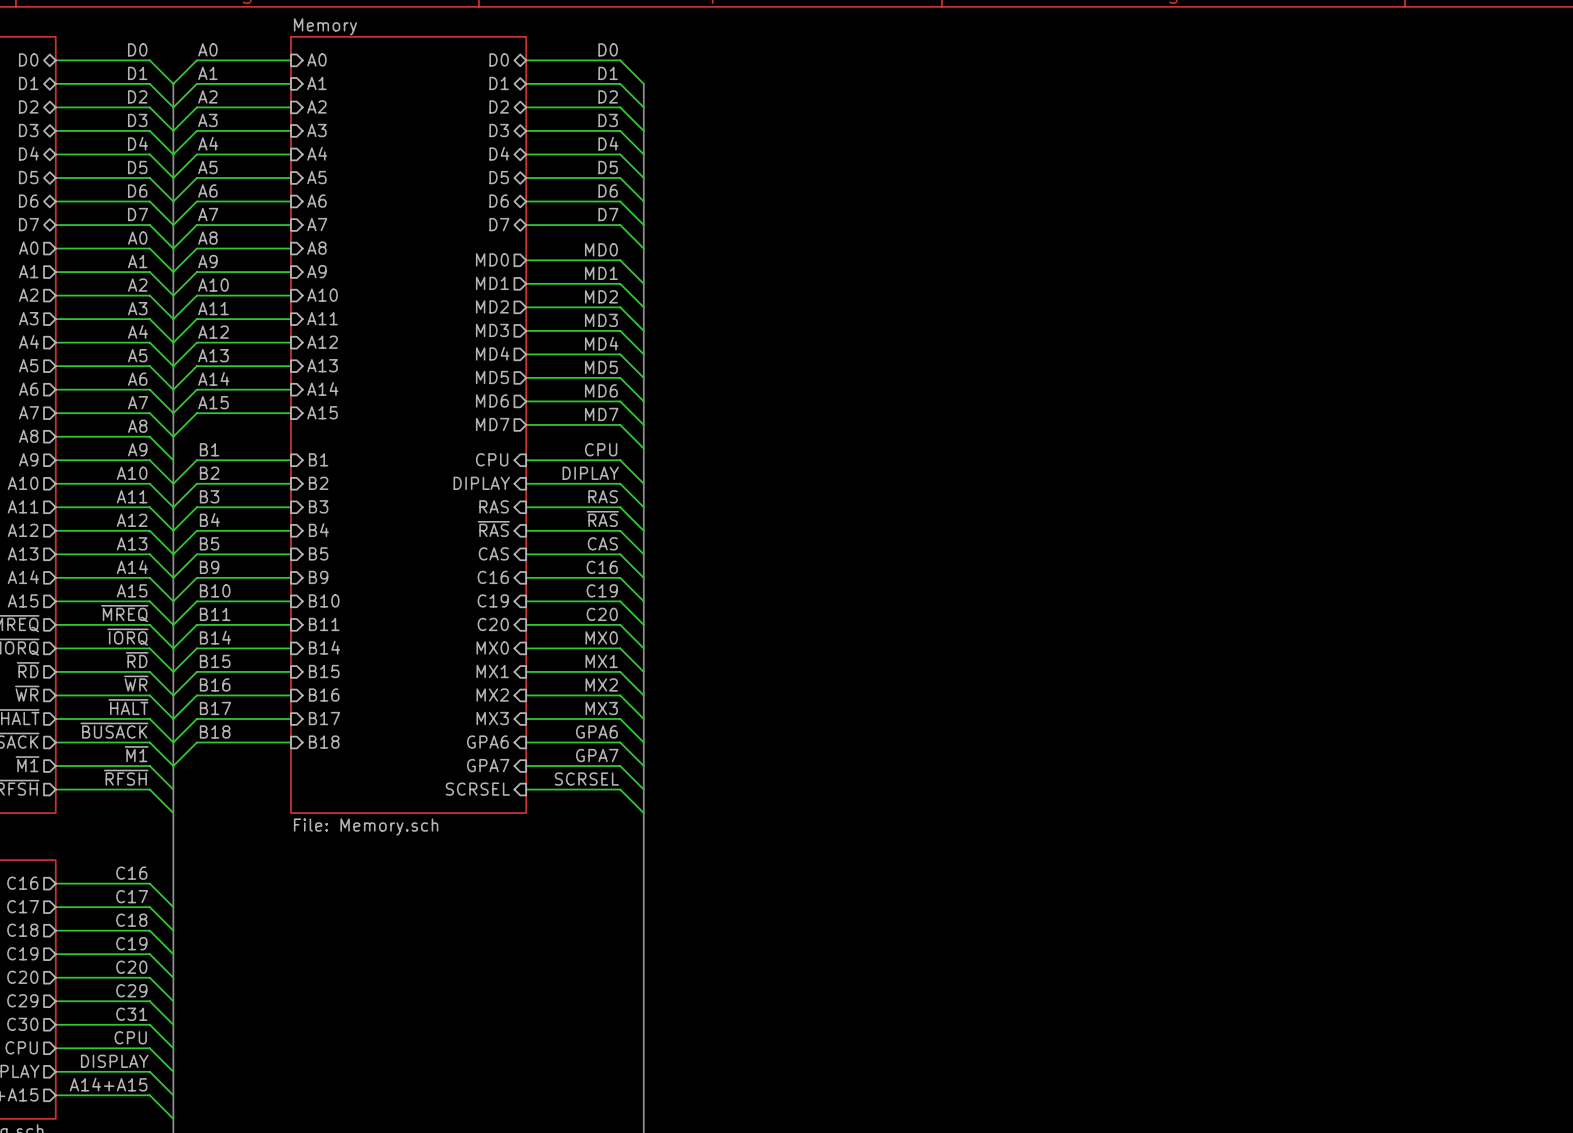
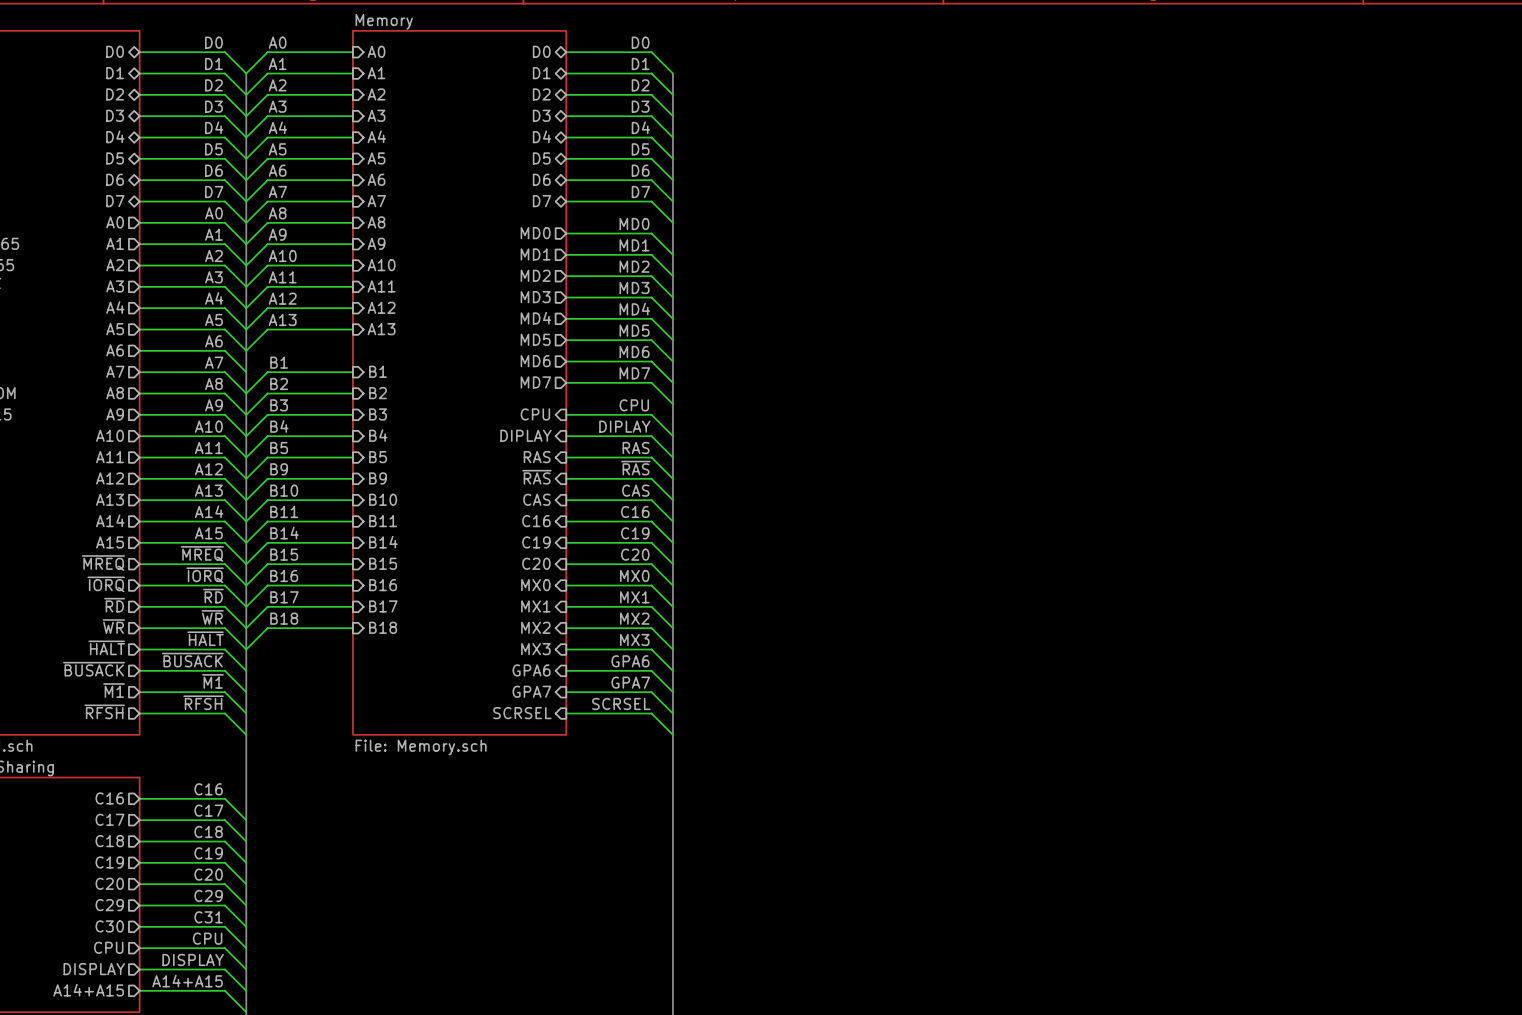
label: A14 (213, 378) -> none
sheet pin: A14 (322, 388) -> none
wire: (290, 389) (196, 389) (173, 413) -> (352, 393) (267, 393) (246, 414)
label: A15 (213, 402) -> B1 (279, 362)
sheet pin: A15 (322, 412) -> B1 (378, 371)
label: none -> B2 (279, 384)
sheet pin: none -> B2 (378, 393)
label: B1 (209, 449) -> B3 (279, 405)
sheet pin: B1 (318, 459) -> B3 (378, 414)
label: B2 (209, 473) -> B4 (279, 426)
sheet pin: B2 (318, 483) -> B4 (378, 435)
label: B3 (209, 496) -> B5 (279, 448)
sheet pin: B3 (318, 506) -> B5 (378, 457)
label: B4 (209, 520) -> B9 (279, 469)
sheet pin: B4 (318, 530) -> B9 (378, 478)
label: B5 (209, 543) -> B10 (284, 490)
sheet pin: B5 (318, 553) -> B10 (383, 499)
label: B9 (209, 567) -> B11 (284, 511)
sheet pin: B9 (318, 577) -> B11 (383, 521)
label: B10 (215, 590) -> B14 (284, 533)
sheet pin: B10 (324, 600) -> B14 (383, 542)
label: B11 (215, 614) -> B15 (284, 554)
sheet pin: B11 (324, 624) -> B15 (383, 563)
label: B14 (215, 637) -> B16 (284, 575)
sheet pin: B14 (324, 647) -> B16 (383, 585)
label: B15 (215, 661) -> B17 (284, 597)
sheet pin: B15 (324, 671) -> B17 (383, 606)
label: B16 (215, 684) -> B18 (284, 618)
sheet pin: B16 (324, 695) -> B18 (383, 627)
label: B17 (215, 708) -> none
wire: (290, 718) (196, 718) (173, 742) -> none
sheet pin: B17 (324, 718) -> none
label: B18 (215, 732) -> none
wire: (290, 742) (196, 742) (173, 766) -> none
sheet pin: B18 (324, 742) -> none

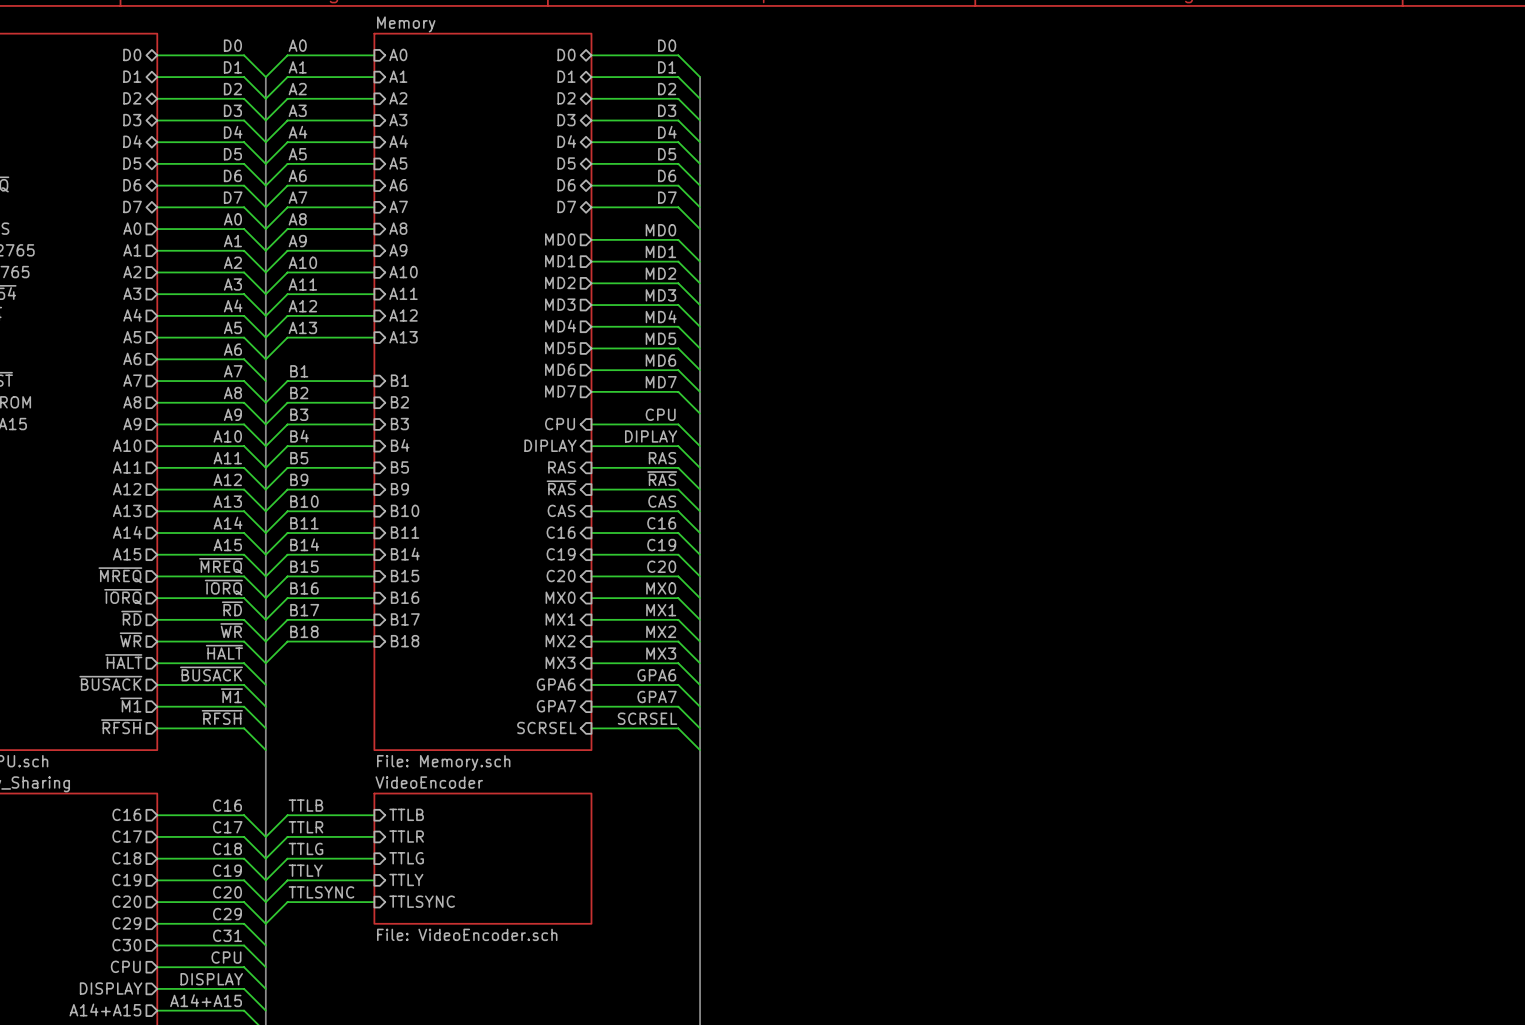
label: none -> TTLB (305, 805)
wire: none -> (374, 815) (287, 815) (265, 836)
sheet pin: none -> TTLB (406, 814)
label: none -> TTLR (305, 827)
sheet pin: none -> TTLR (406, 836)
wire: none -> (374, 836) (287, 836) (265, 858)
label: none -> TTLG (305, 848)
wire: none -> (374, 858) (287, 858) (265, 880)
sheet pin: none -> TTLG (406, 858)
sheet VideoEncoder: none -> File: VideoEncoder.sch (482, 858)
label: none -> TTLY (305, 870)
wire: none -> (374, 880) (287, 880) (265, 902)
sheet pin: none -> TTLY (406, 879)
label: none -> TTLSYNC (321, 892)
sheet pin: none -> TTLSYNC (422, 901)
wire: none -> (374, 902) (287, 902) (265, 923)

